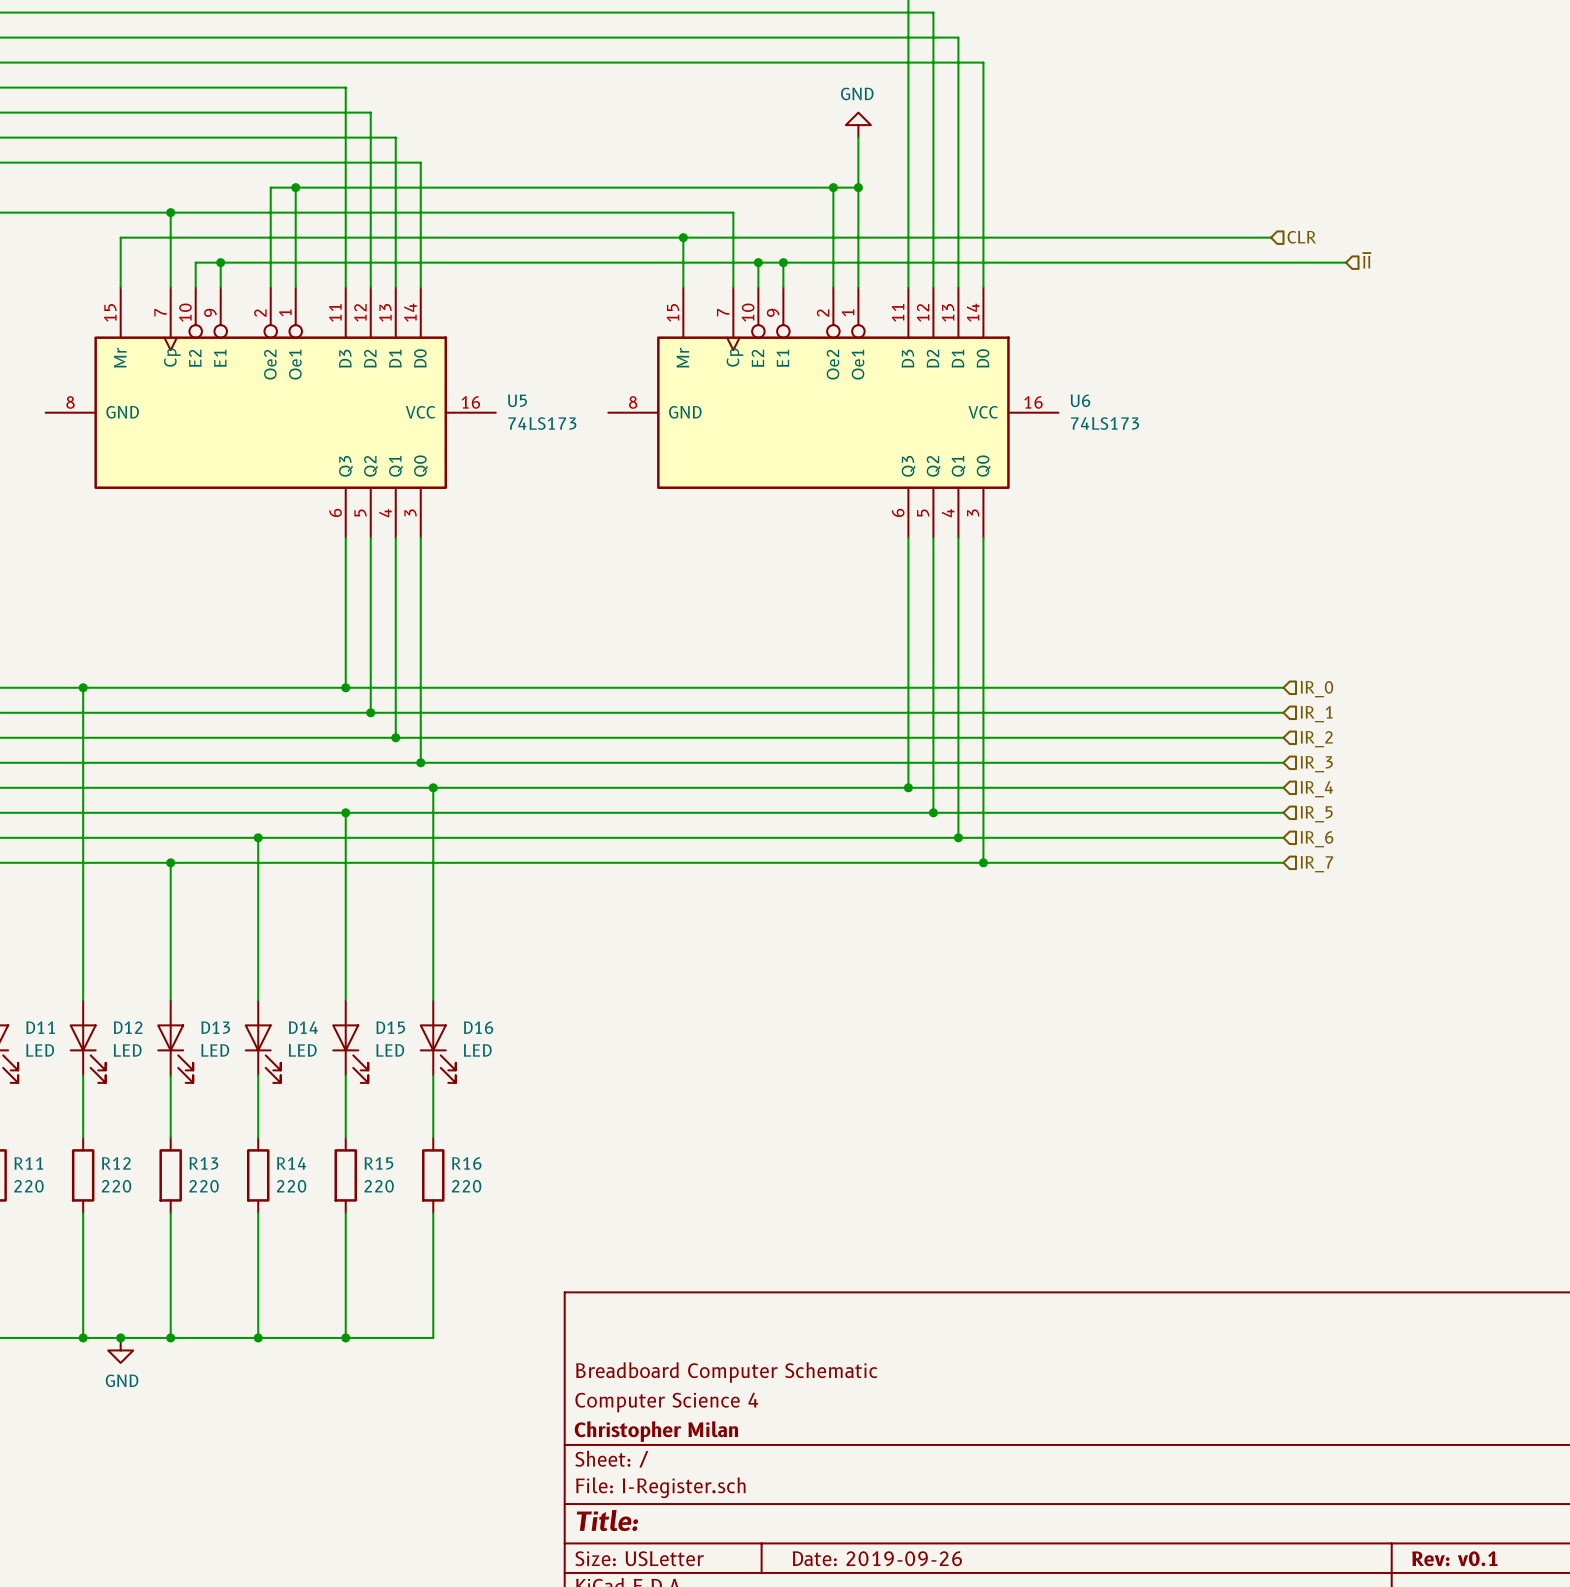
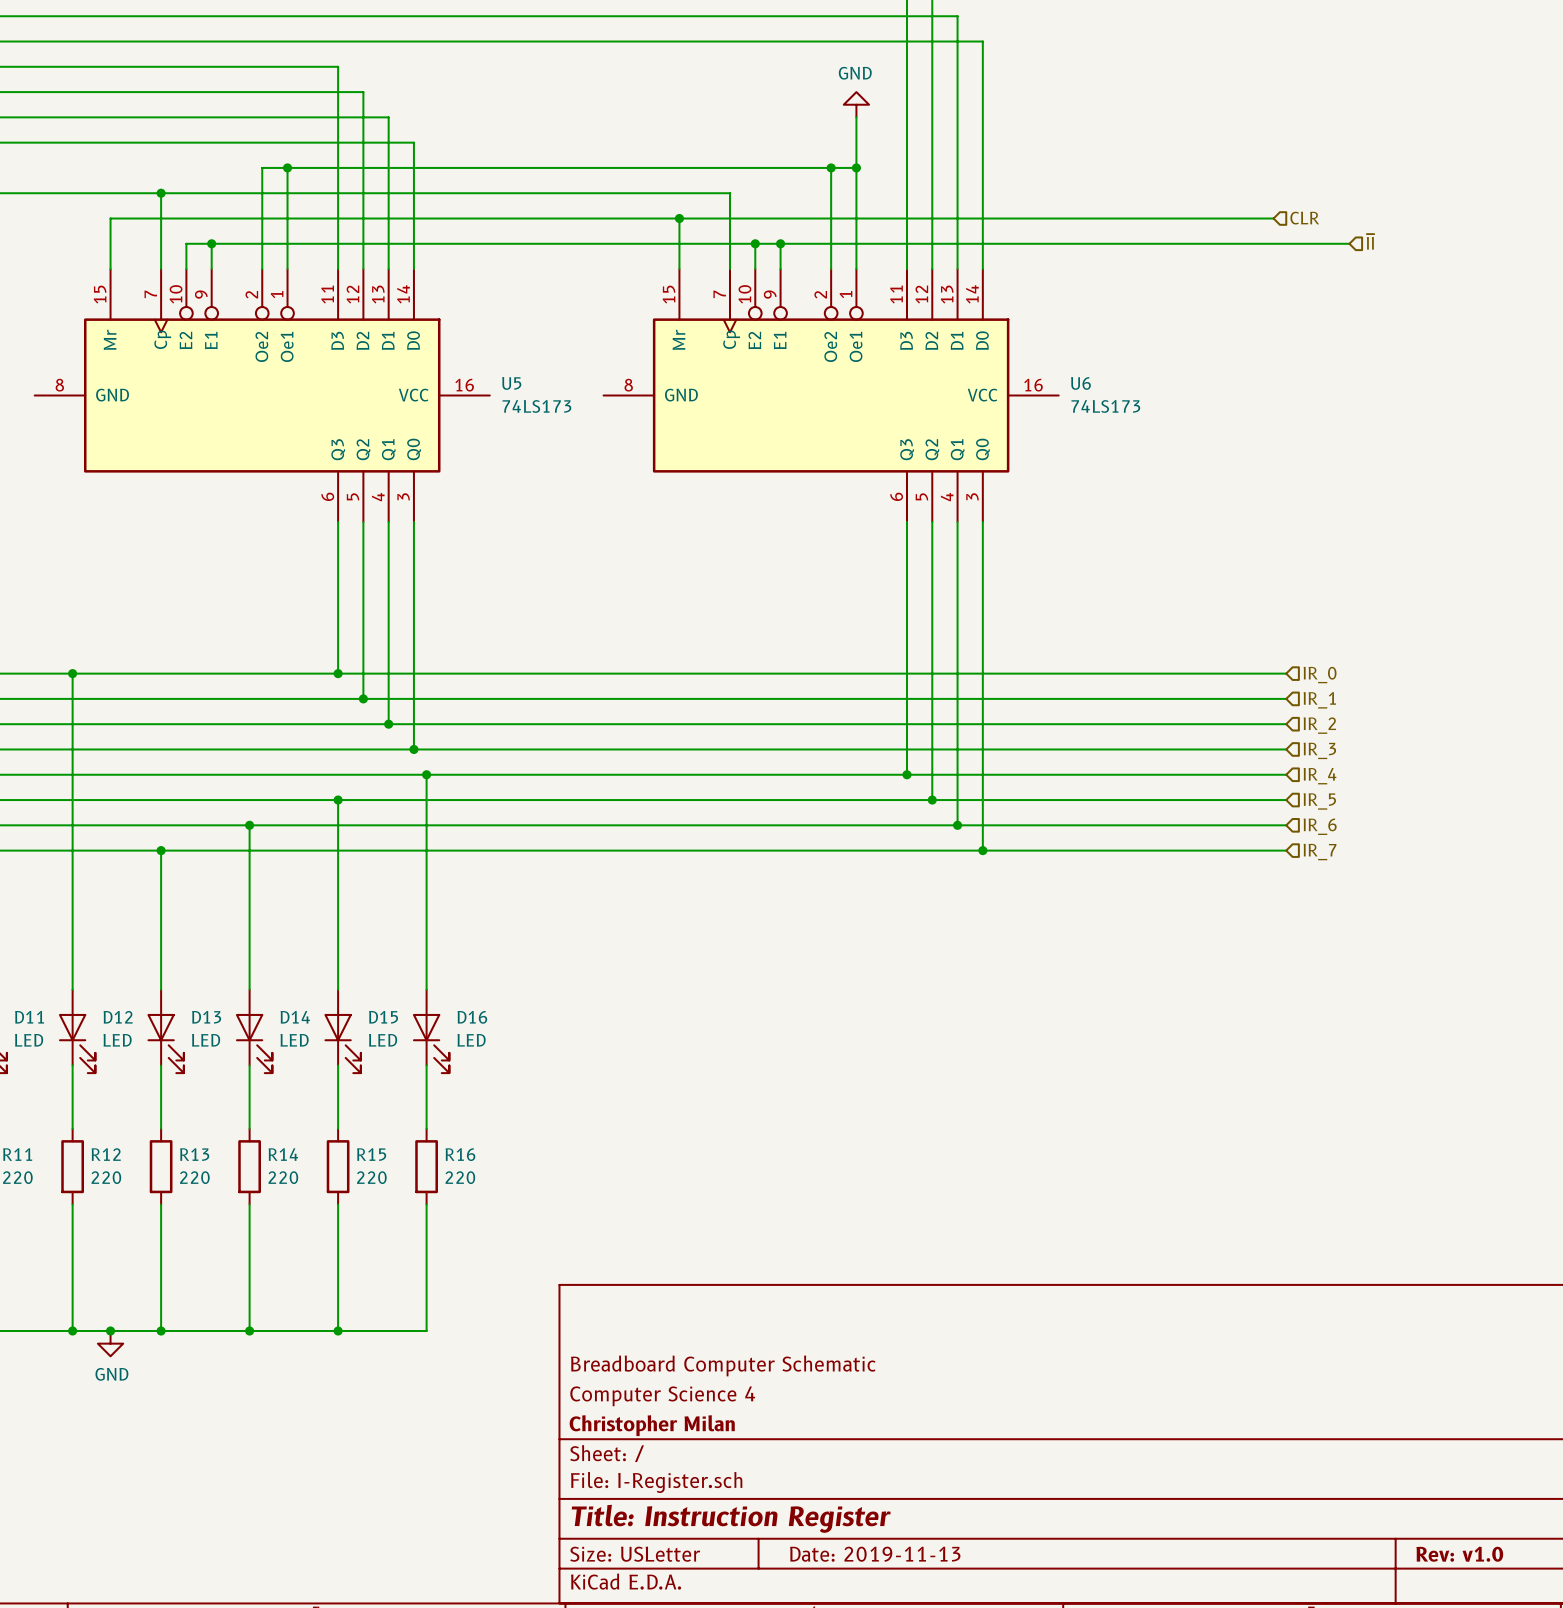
title block: Title: (607, 1520) -> Title: Instruction Register (731, 1518)
title block: Date: 2019-09-26 (877, 1558) -> Date: 2019-11-13 (875, 1554)
title block: Rev: v0.1 (1454, 1558) -> Rev: v1.0 (1459, 1554)

